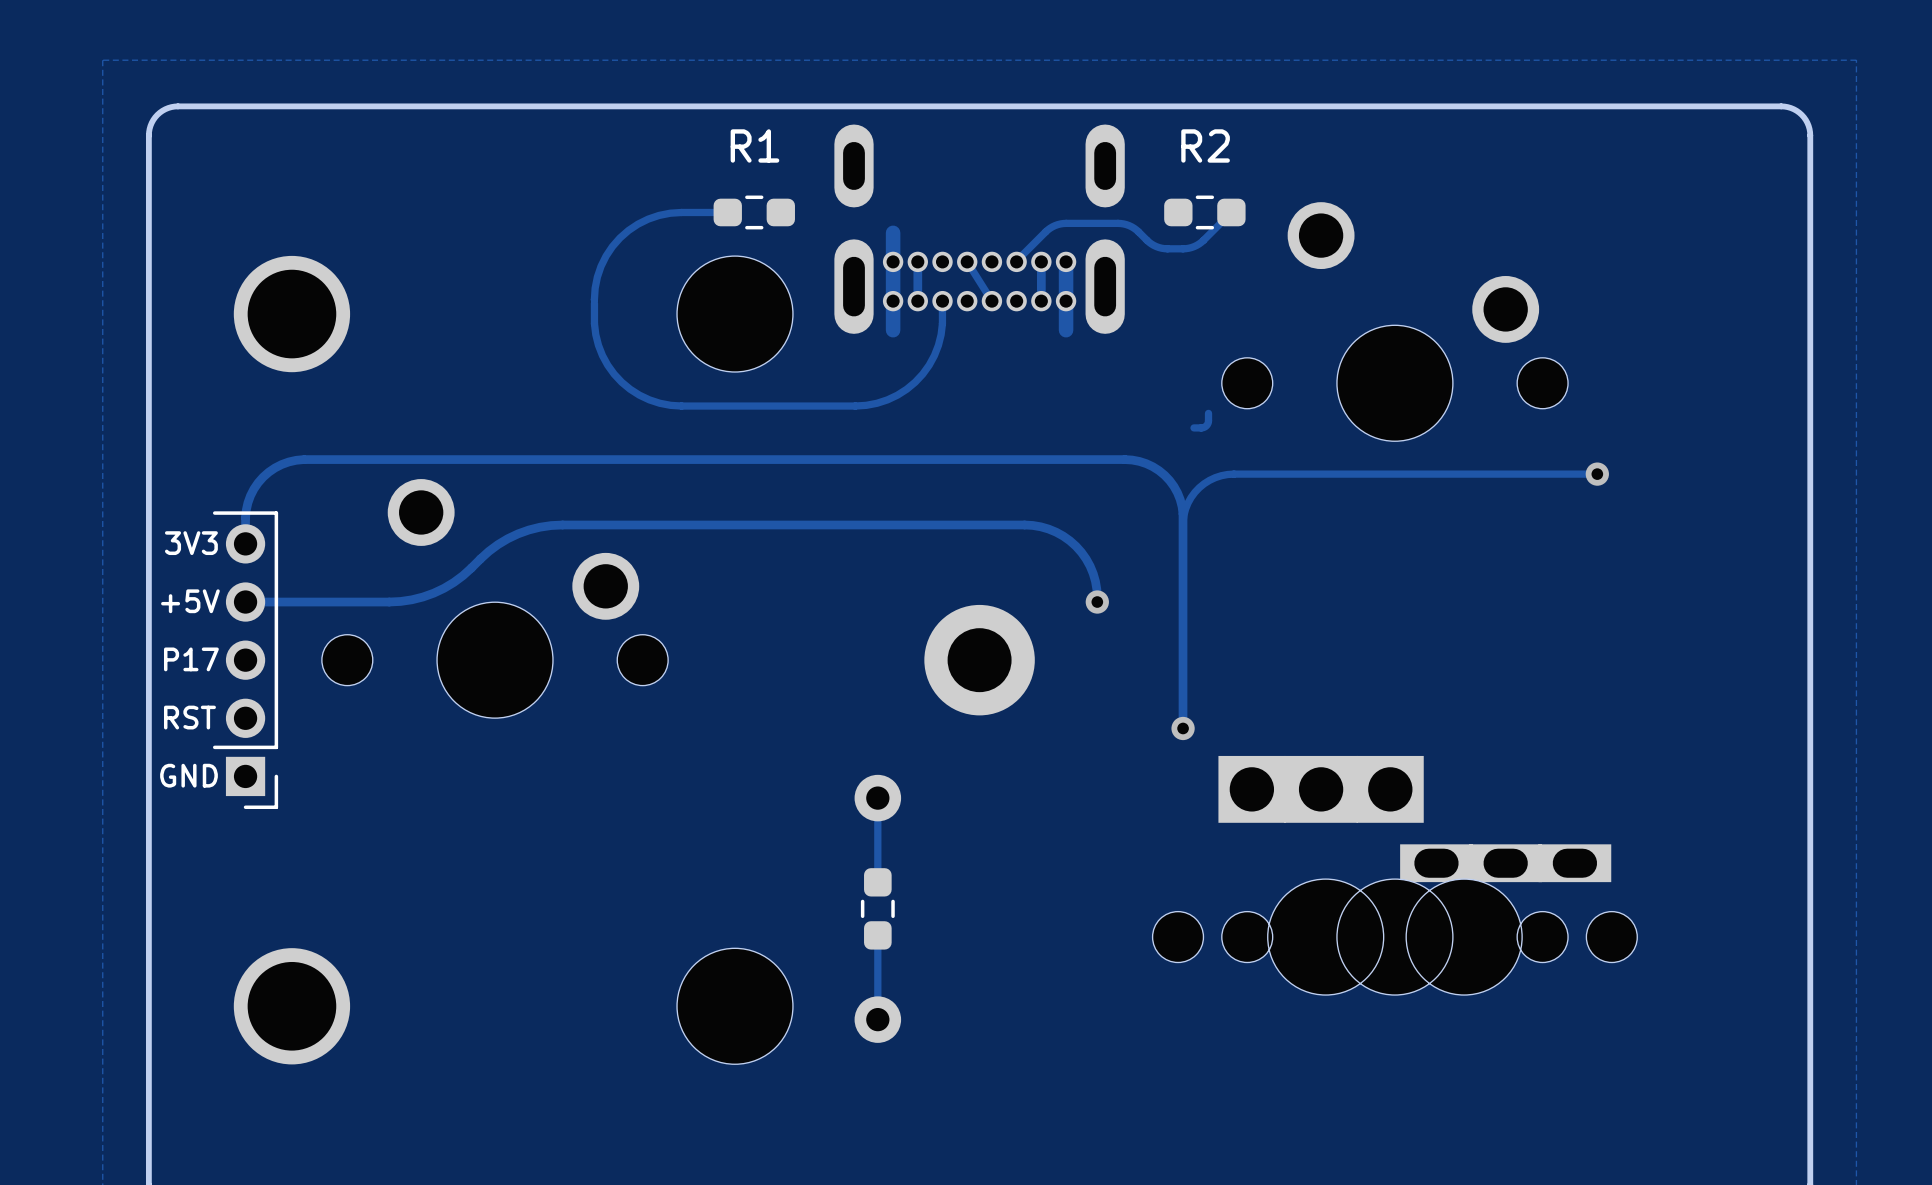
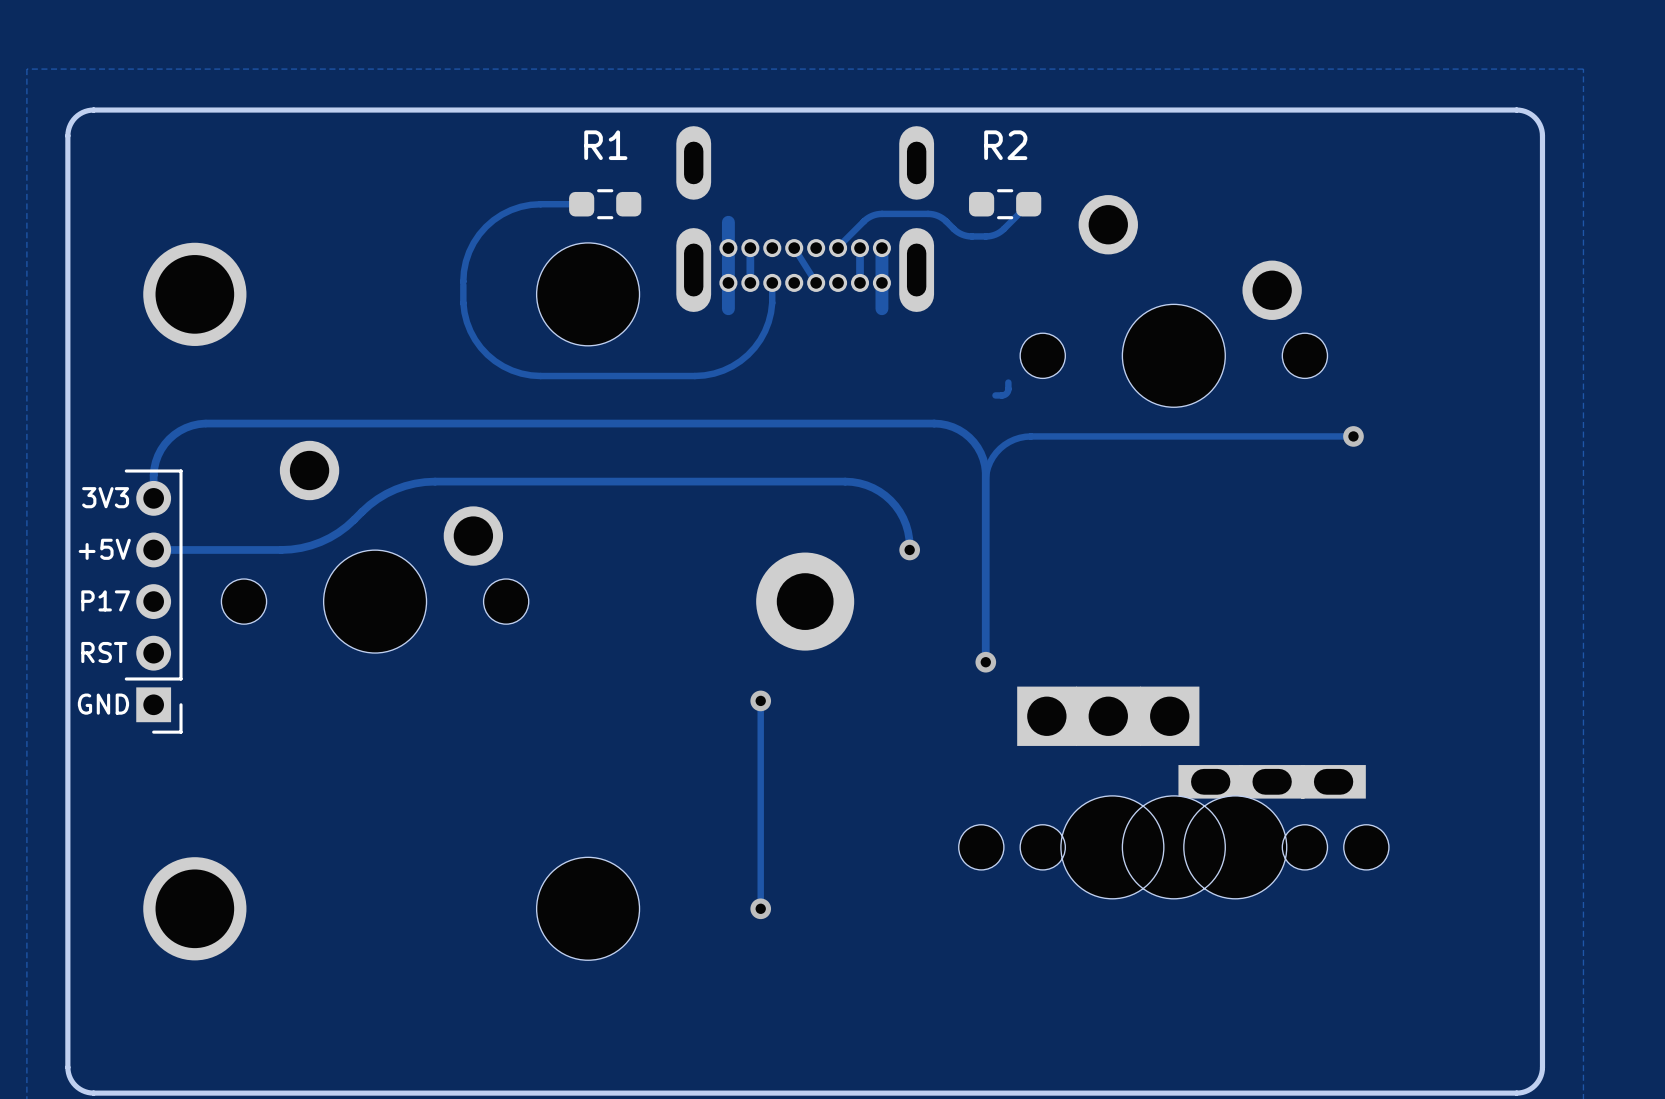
track: none -> (760, 700) (760, 908)
via: none -> (760, 700)
track: (877, 798) (877, 882) -> none
part: (877, 908) -> none
track: (877, 935) (877, 1019) -> none
via: none -> (760, 908)

